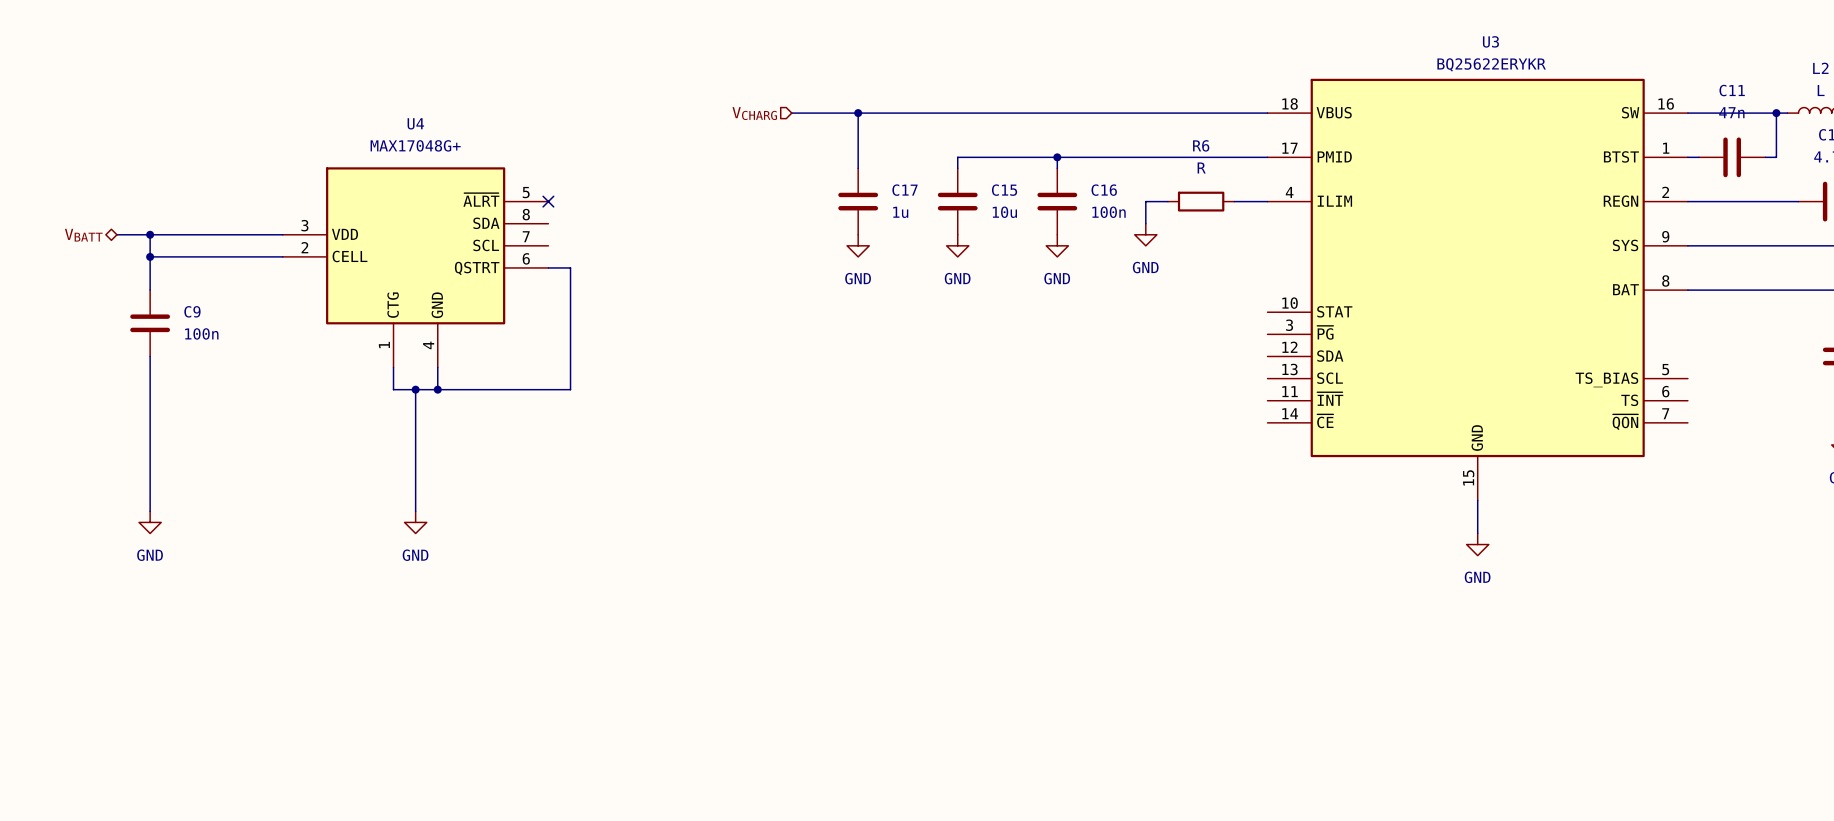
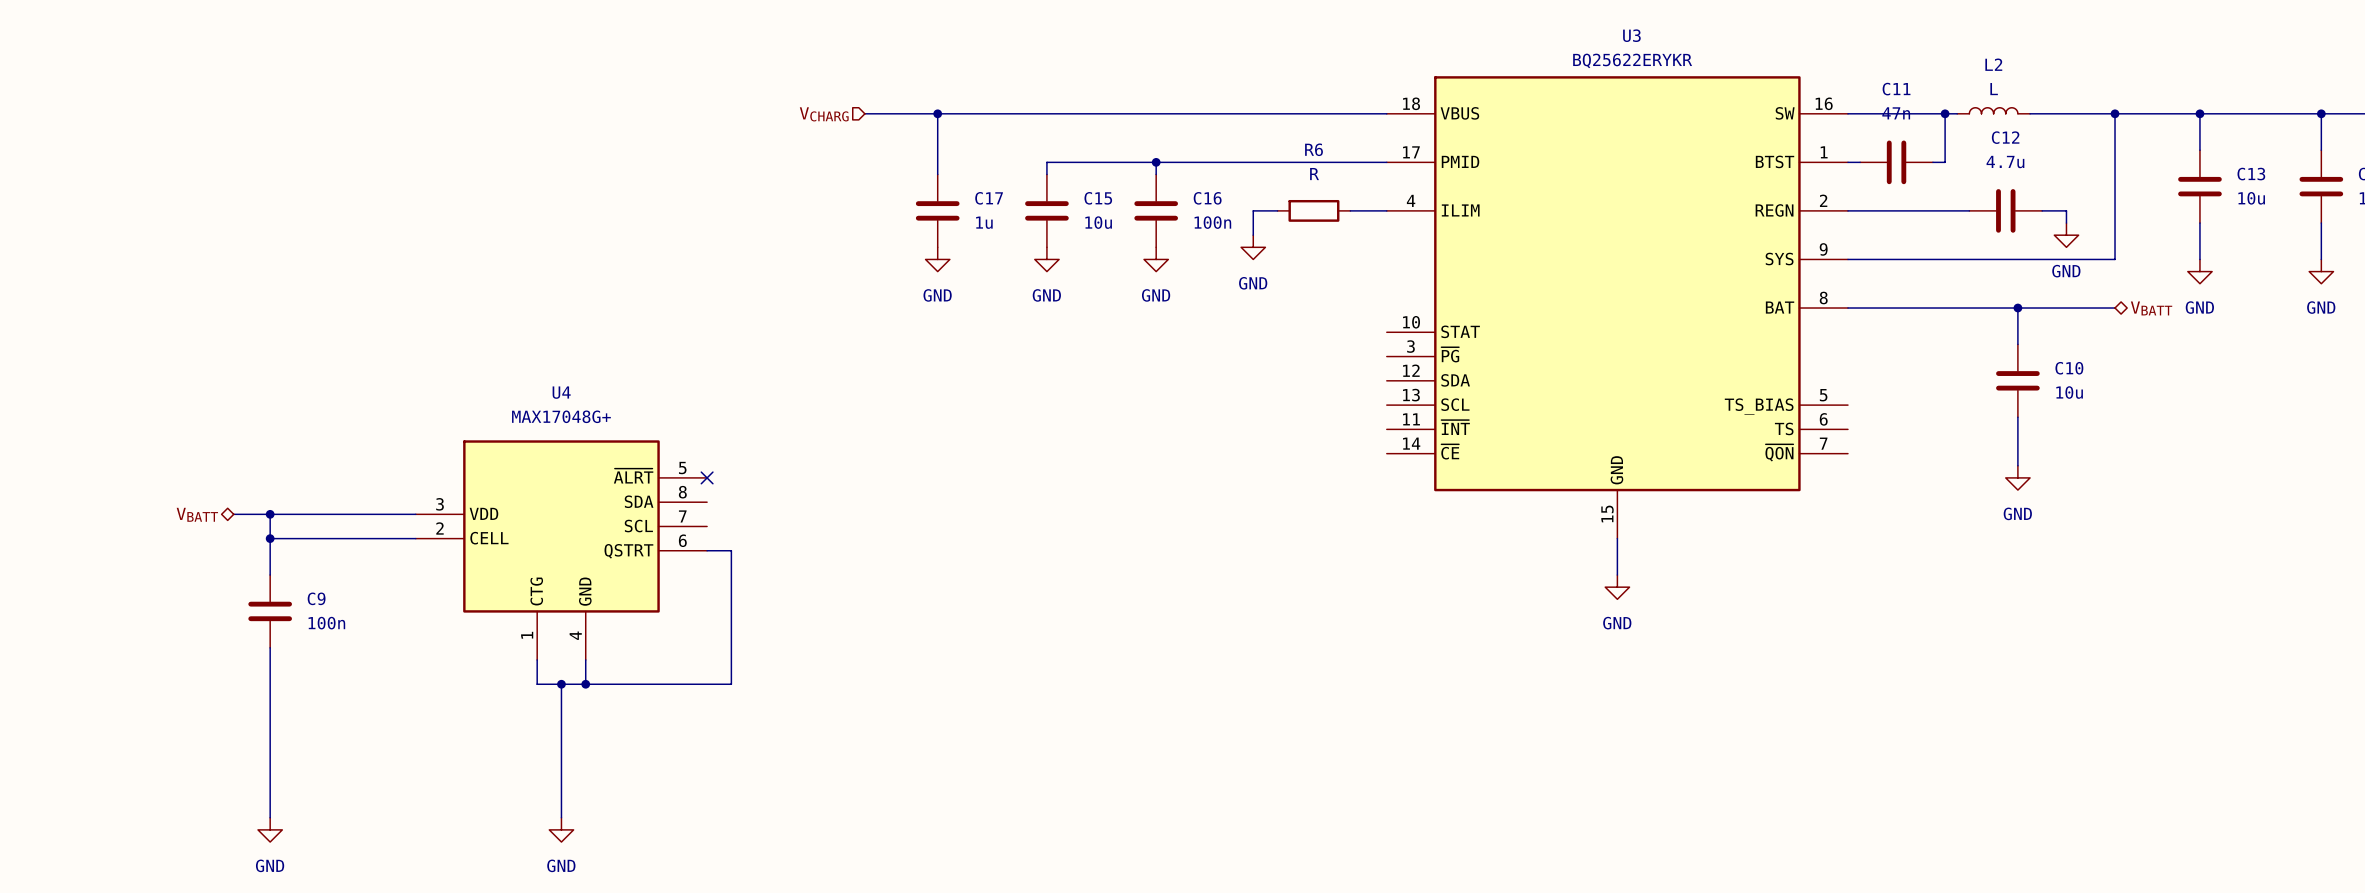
no-connect mark: (548, 201) -> none
wire: (116, 234) (282, 234) -> none
wire: (150, 234) (150, 290) -> none
junction: (150, 234) -> none
hierarchical label: VBATT (83, 235) -> none
wire: (150, 256) (282, 256) -> none
junction: (150, 256) -> none
U4 position: (415, 267) -> (561, 550)
wire: (548, 267) (570, 267) (570, 389) (393, 389) (393, 367) -> none
C9 position: (150, 323) -> (270, 611)
wire: (150, 356) (150, 511) -> none
wire: (437, 367) (437, 389) -> none
wire: (415, 389) (415, 511) -> none
junction: (415, 389) -> none
junction: (437, 389) -> none
no-connect mark: none -> (707, 477)
hierarchical label: none -> VBATT (197, 514)
wire: none -> (233, 514) (415, 514)
wire: none -> (270, 514) (270, 575)
junction: none -> (270, 514)
wire: none -> (270, 538) (415, 538)
junction: none -> (270, 538)
wire: none -> (707, 550) (731, 550) (731, 684) (537, 684) (537, 659)
power symbol: GND (150, 522) -> none
power symbol: GND (415, 522) -> none
wire: none -> (270, 647) (270, 817)
wire: none -> (585, 659) (585, 684)
wire: none -> (561, 684) (561, 817)
junction: none -> (561, 684)
junction: none -> (585, 684)
power symbol: none -> GND (270, 829)
power symbol: none -> GND (561, 829)

